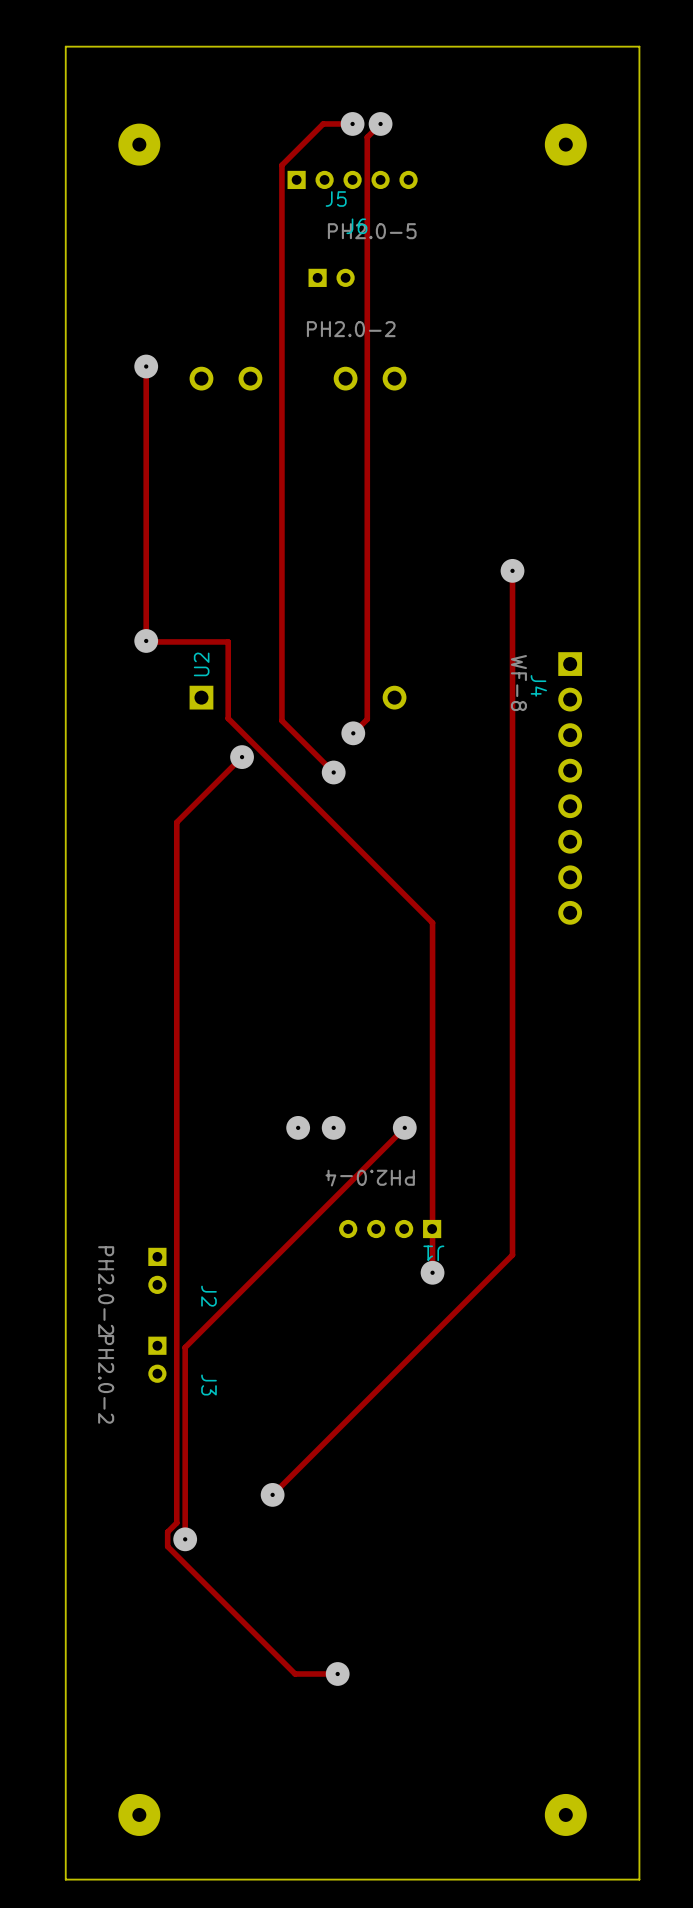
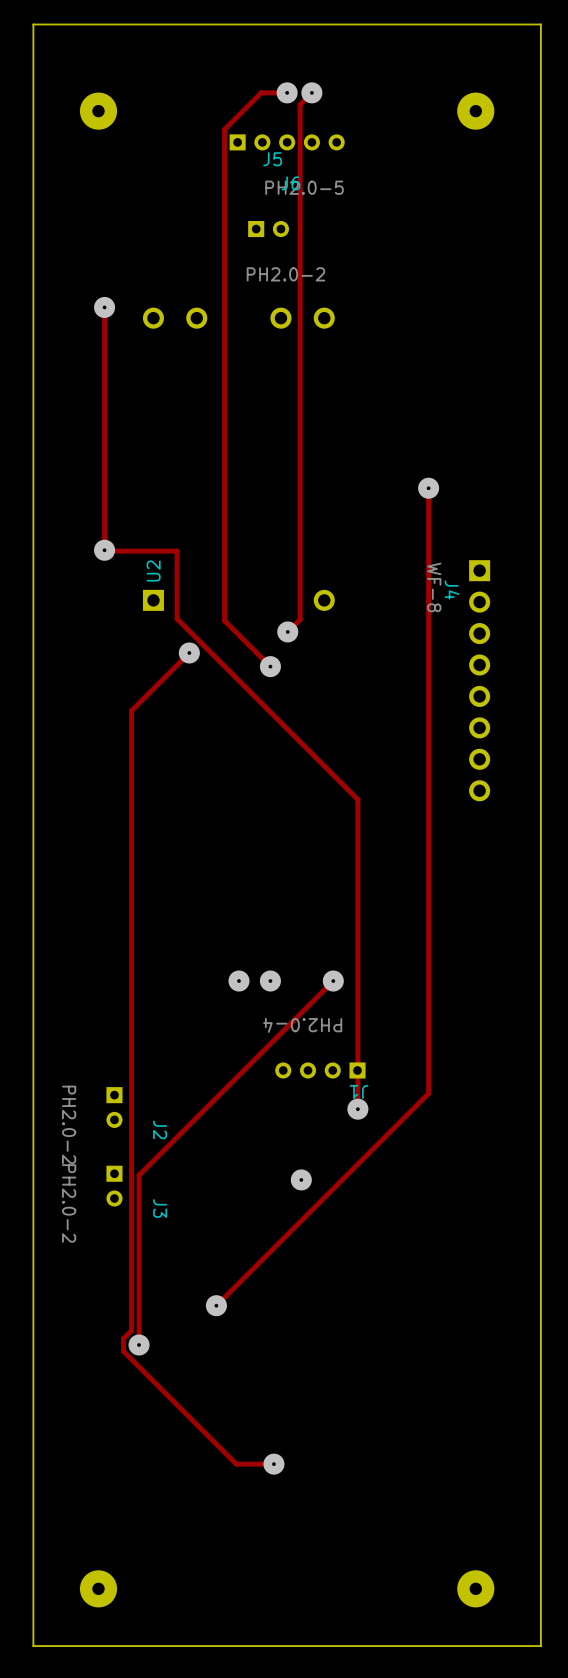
via: none -> (301, 1179)

